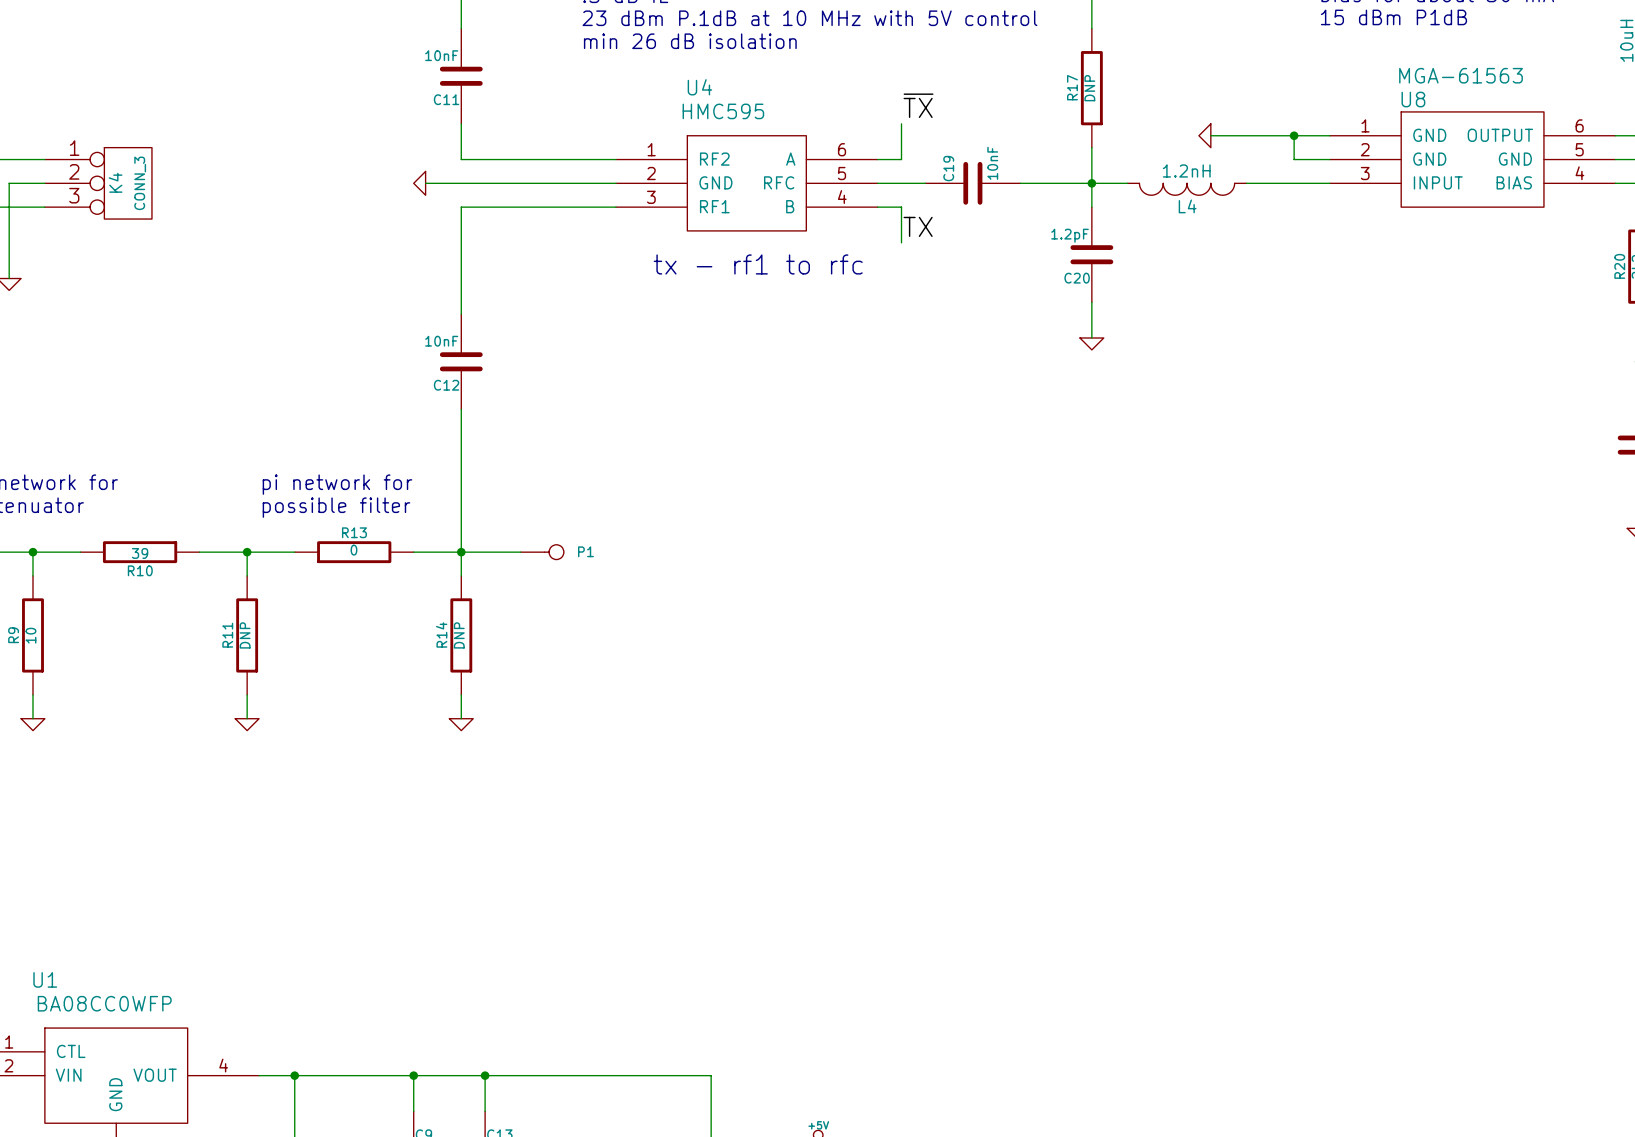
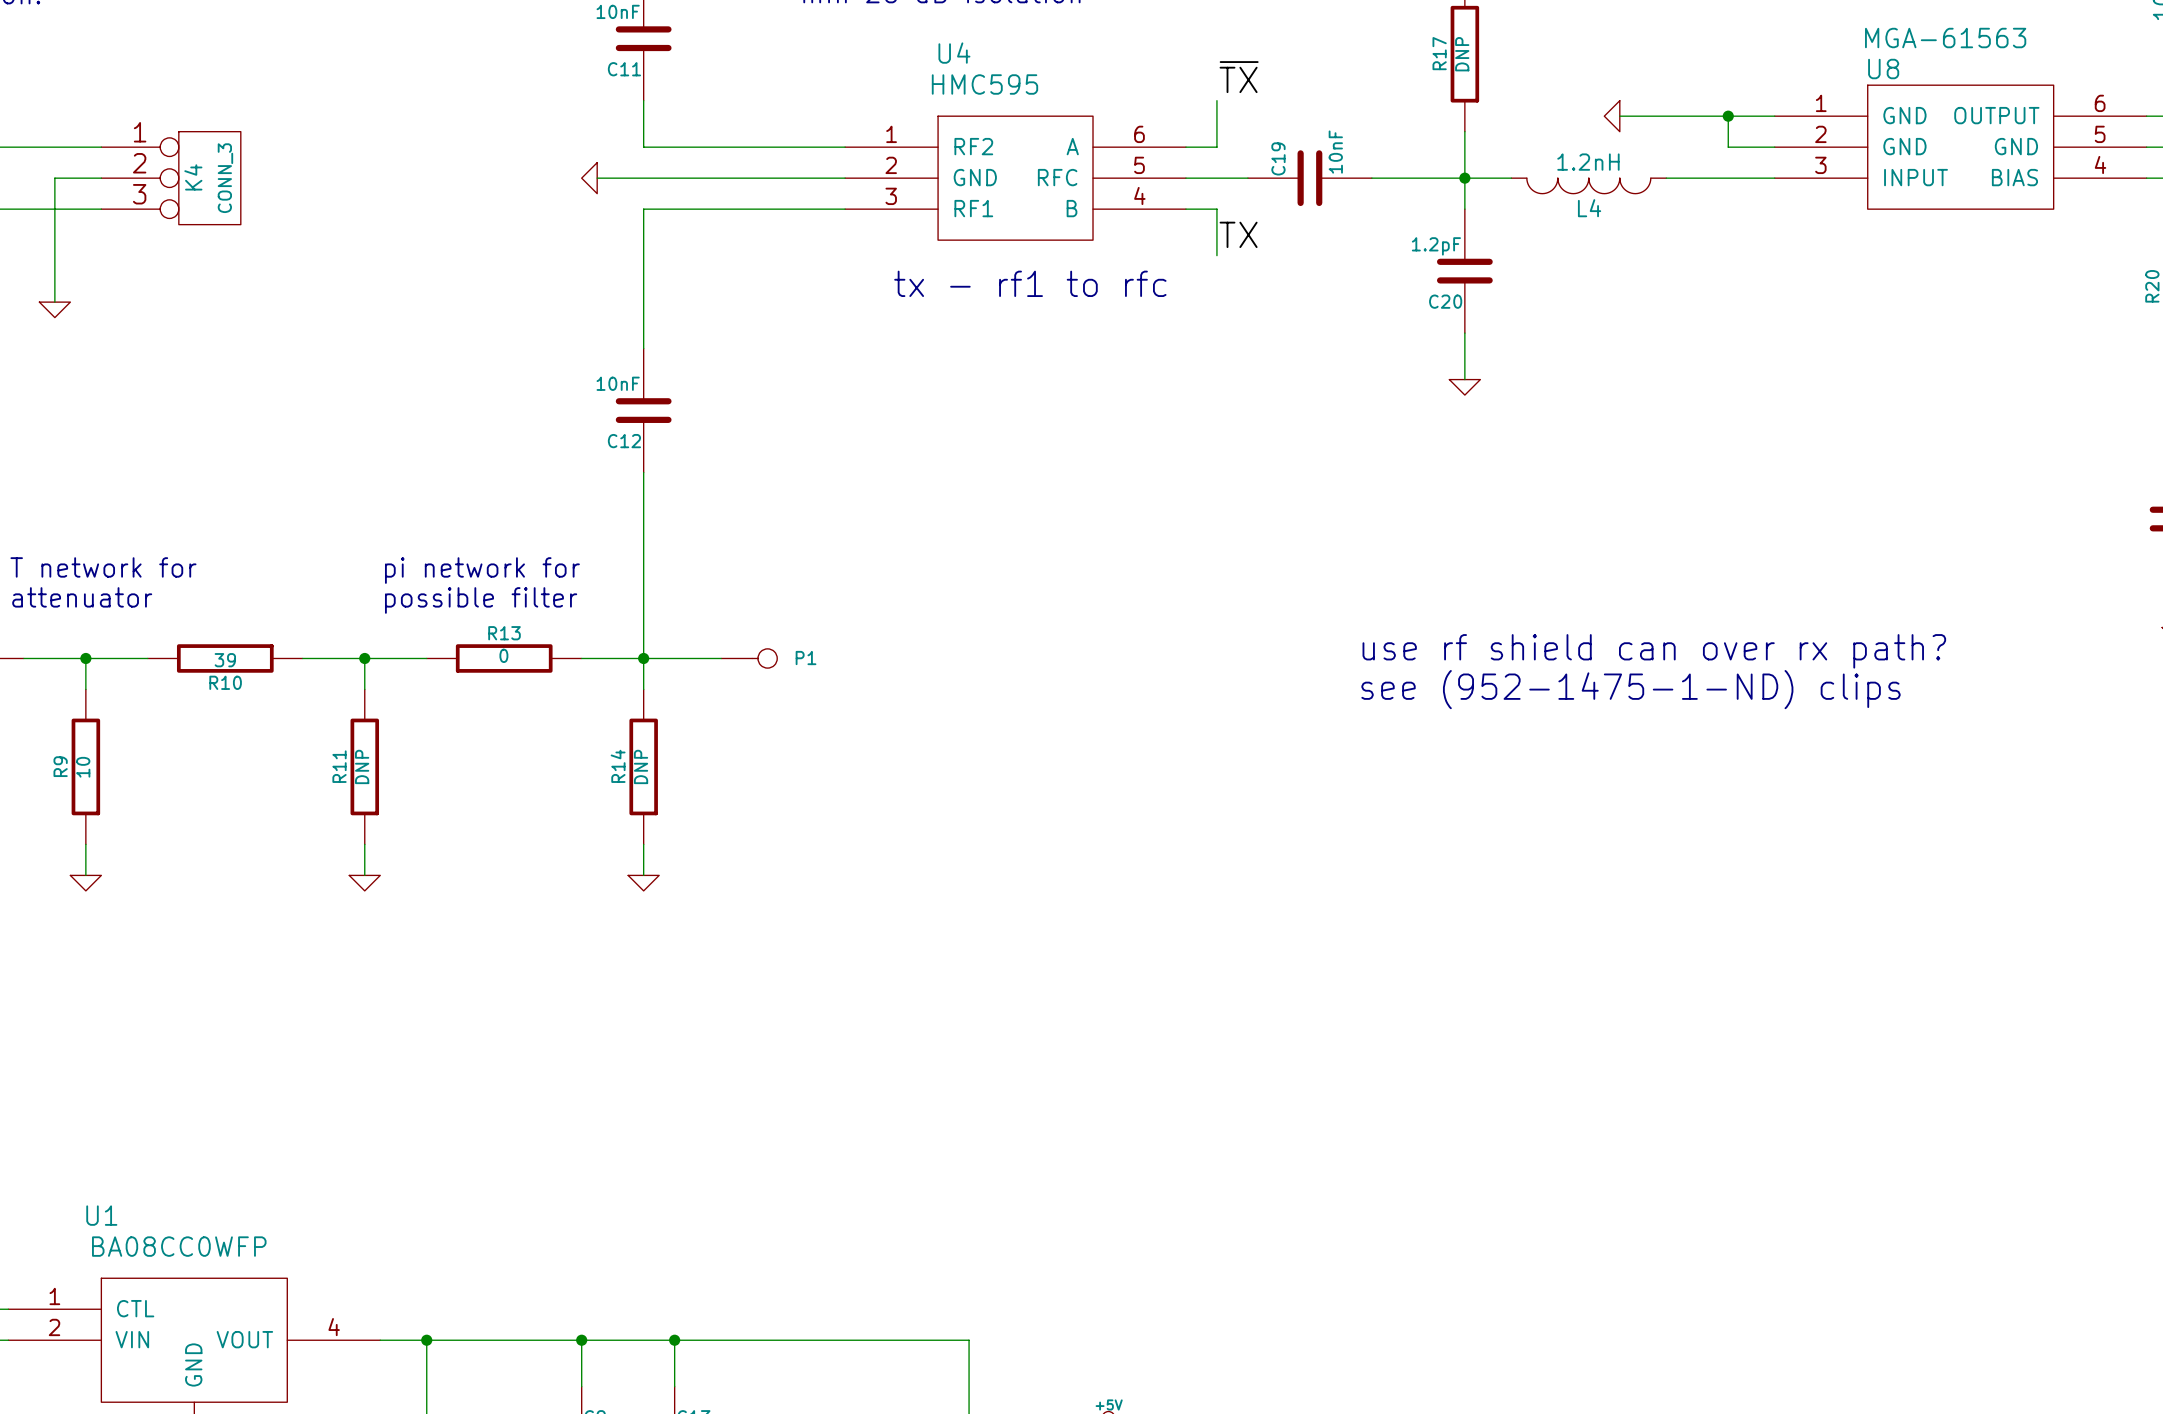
text: none -> use rf shield can over rx path? (1654, 651)
text: none -> see (952-1475-1-ND) clips (1631, 689)

